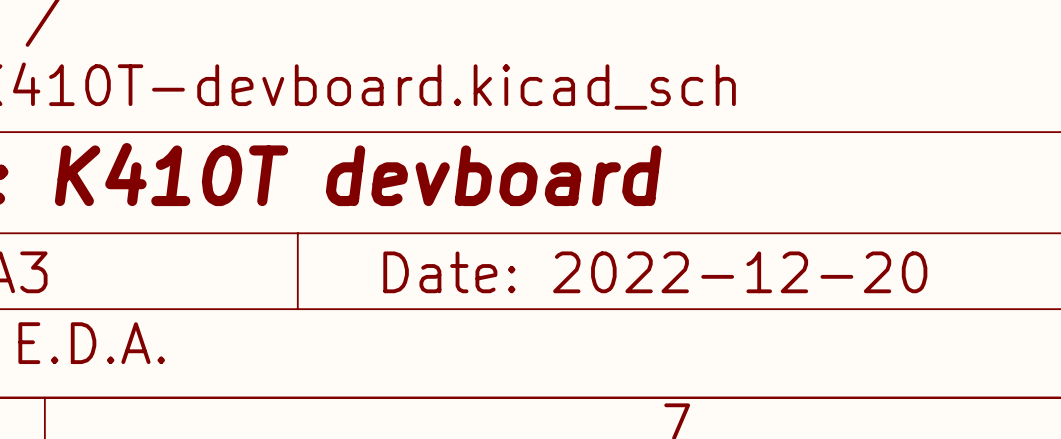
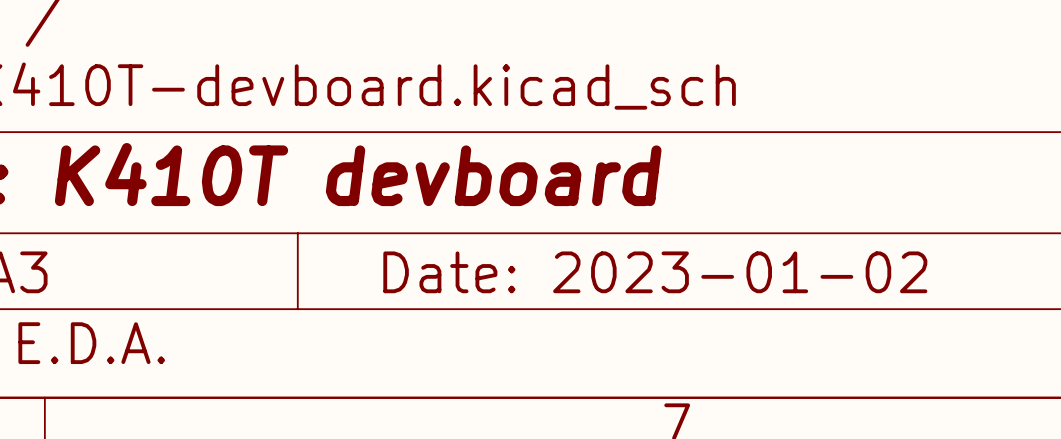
title block: Date: 2022-12-20 (655, 272) -> Date: 2023-01-02 (655, 272)

